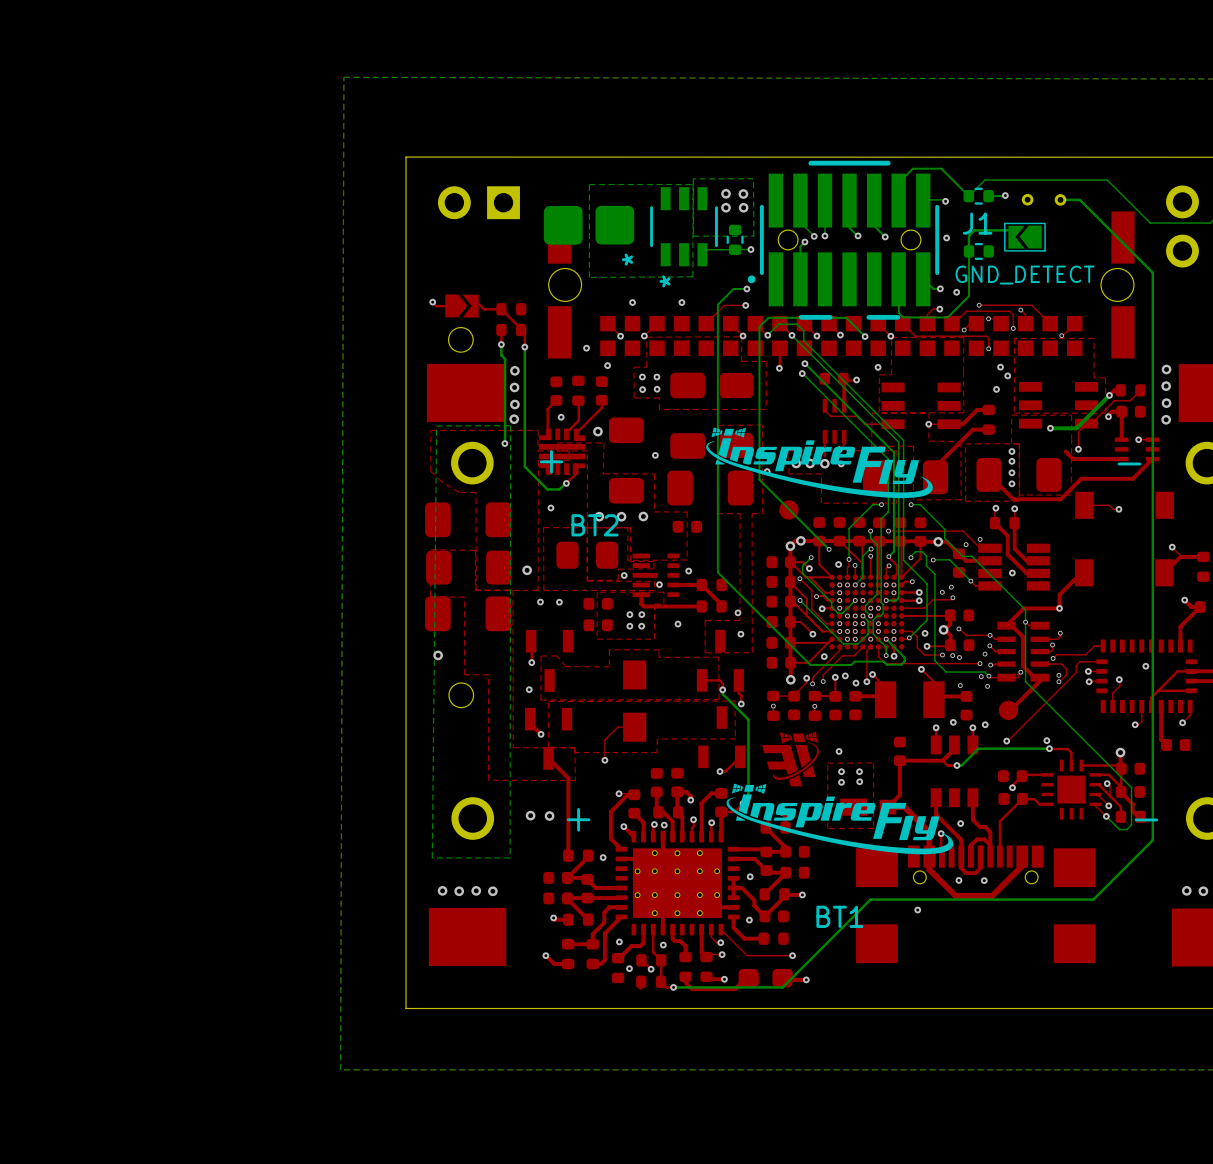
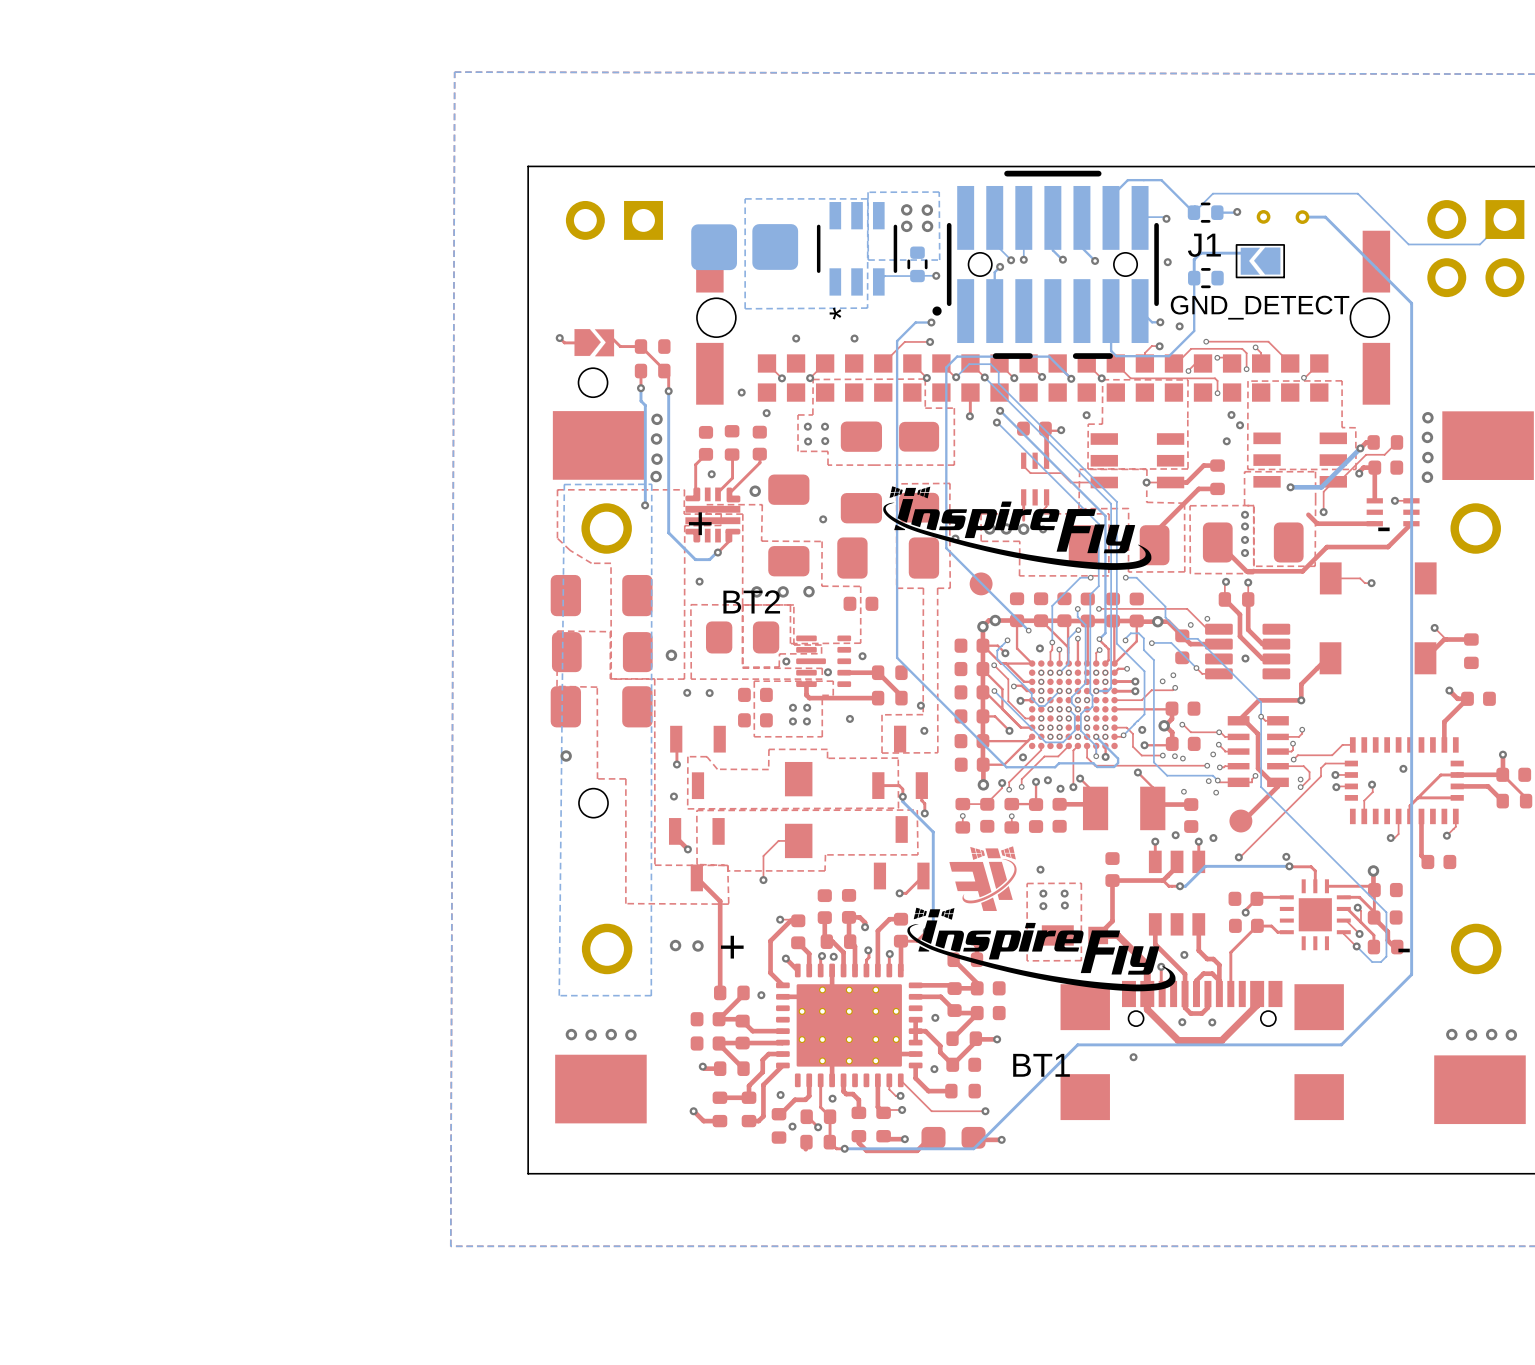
part text: * (627, 259) -> none

